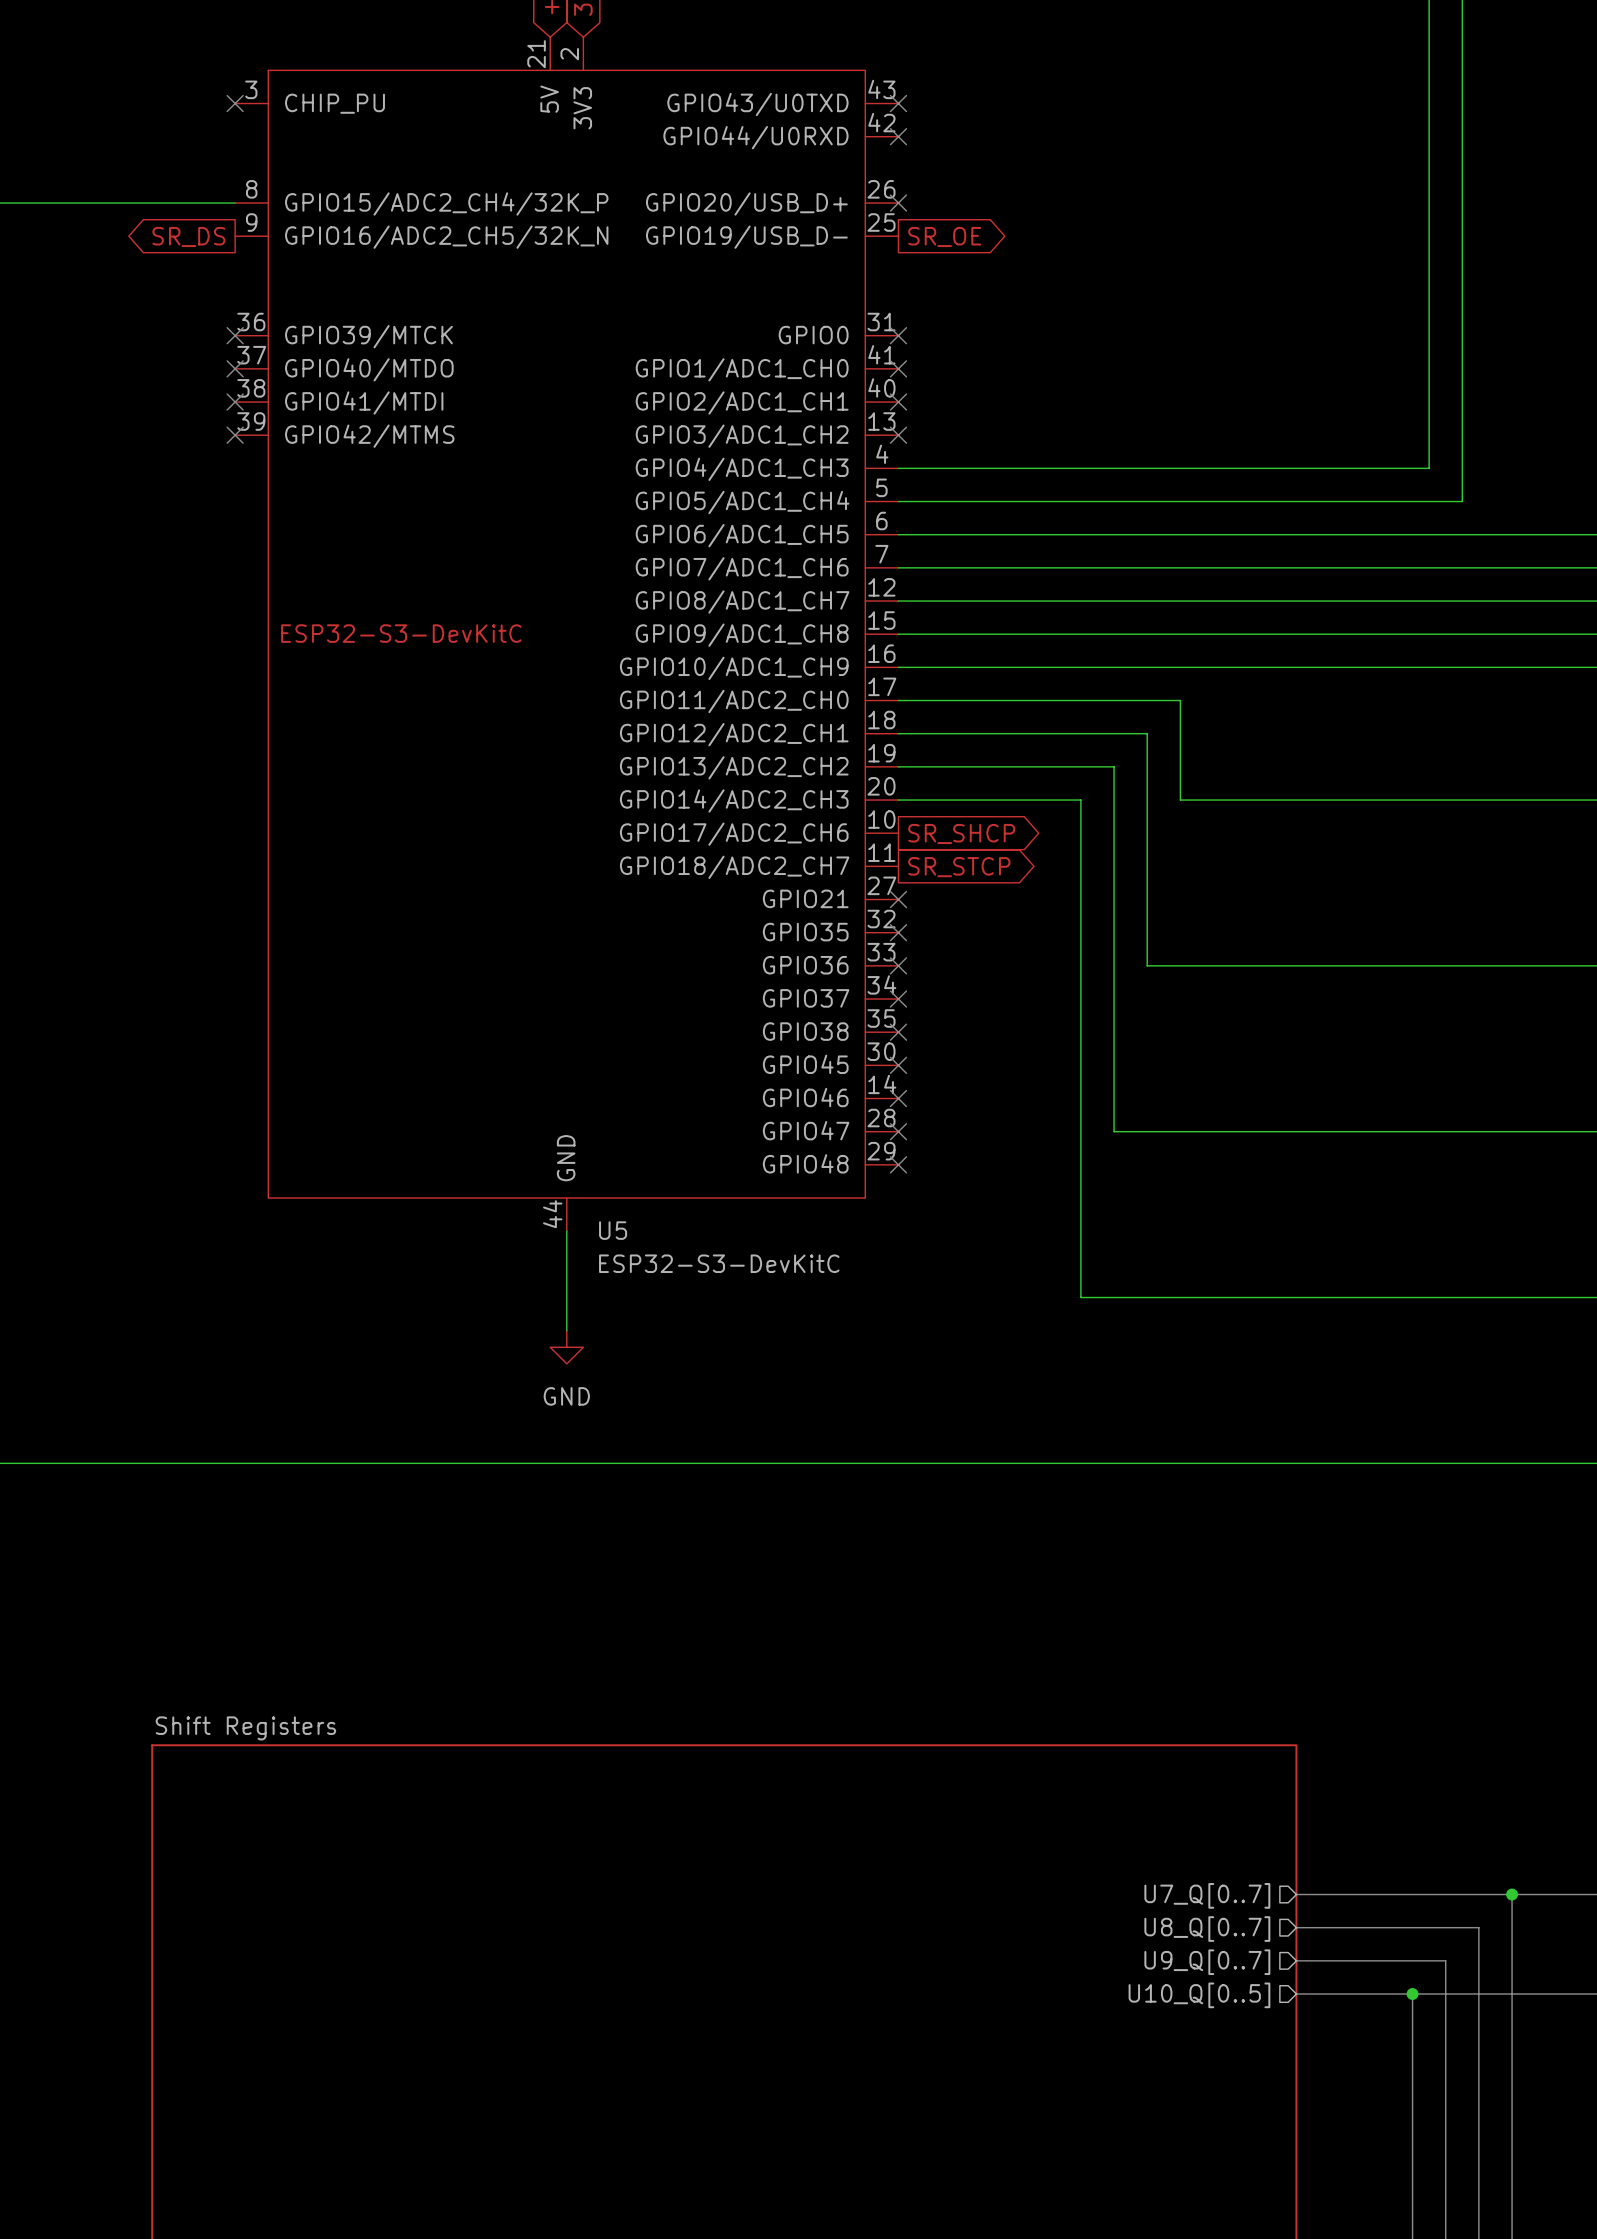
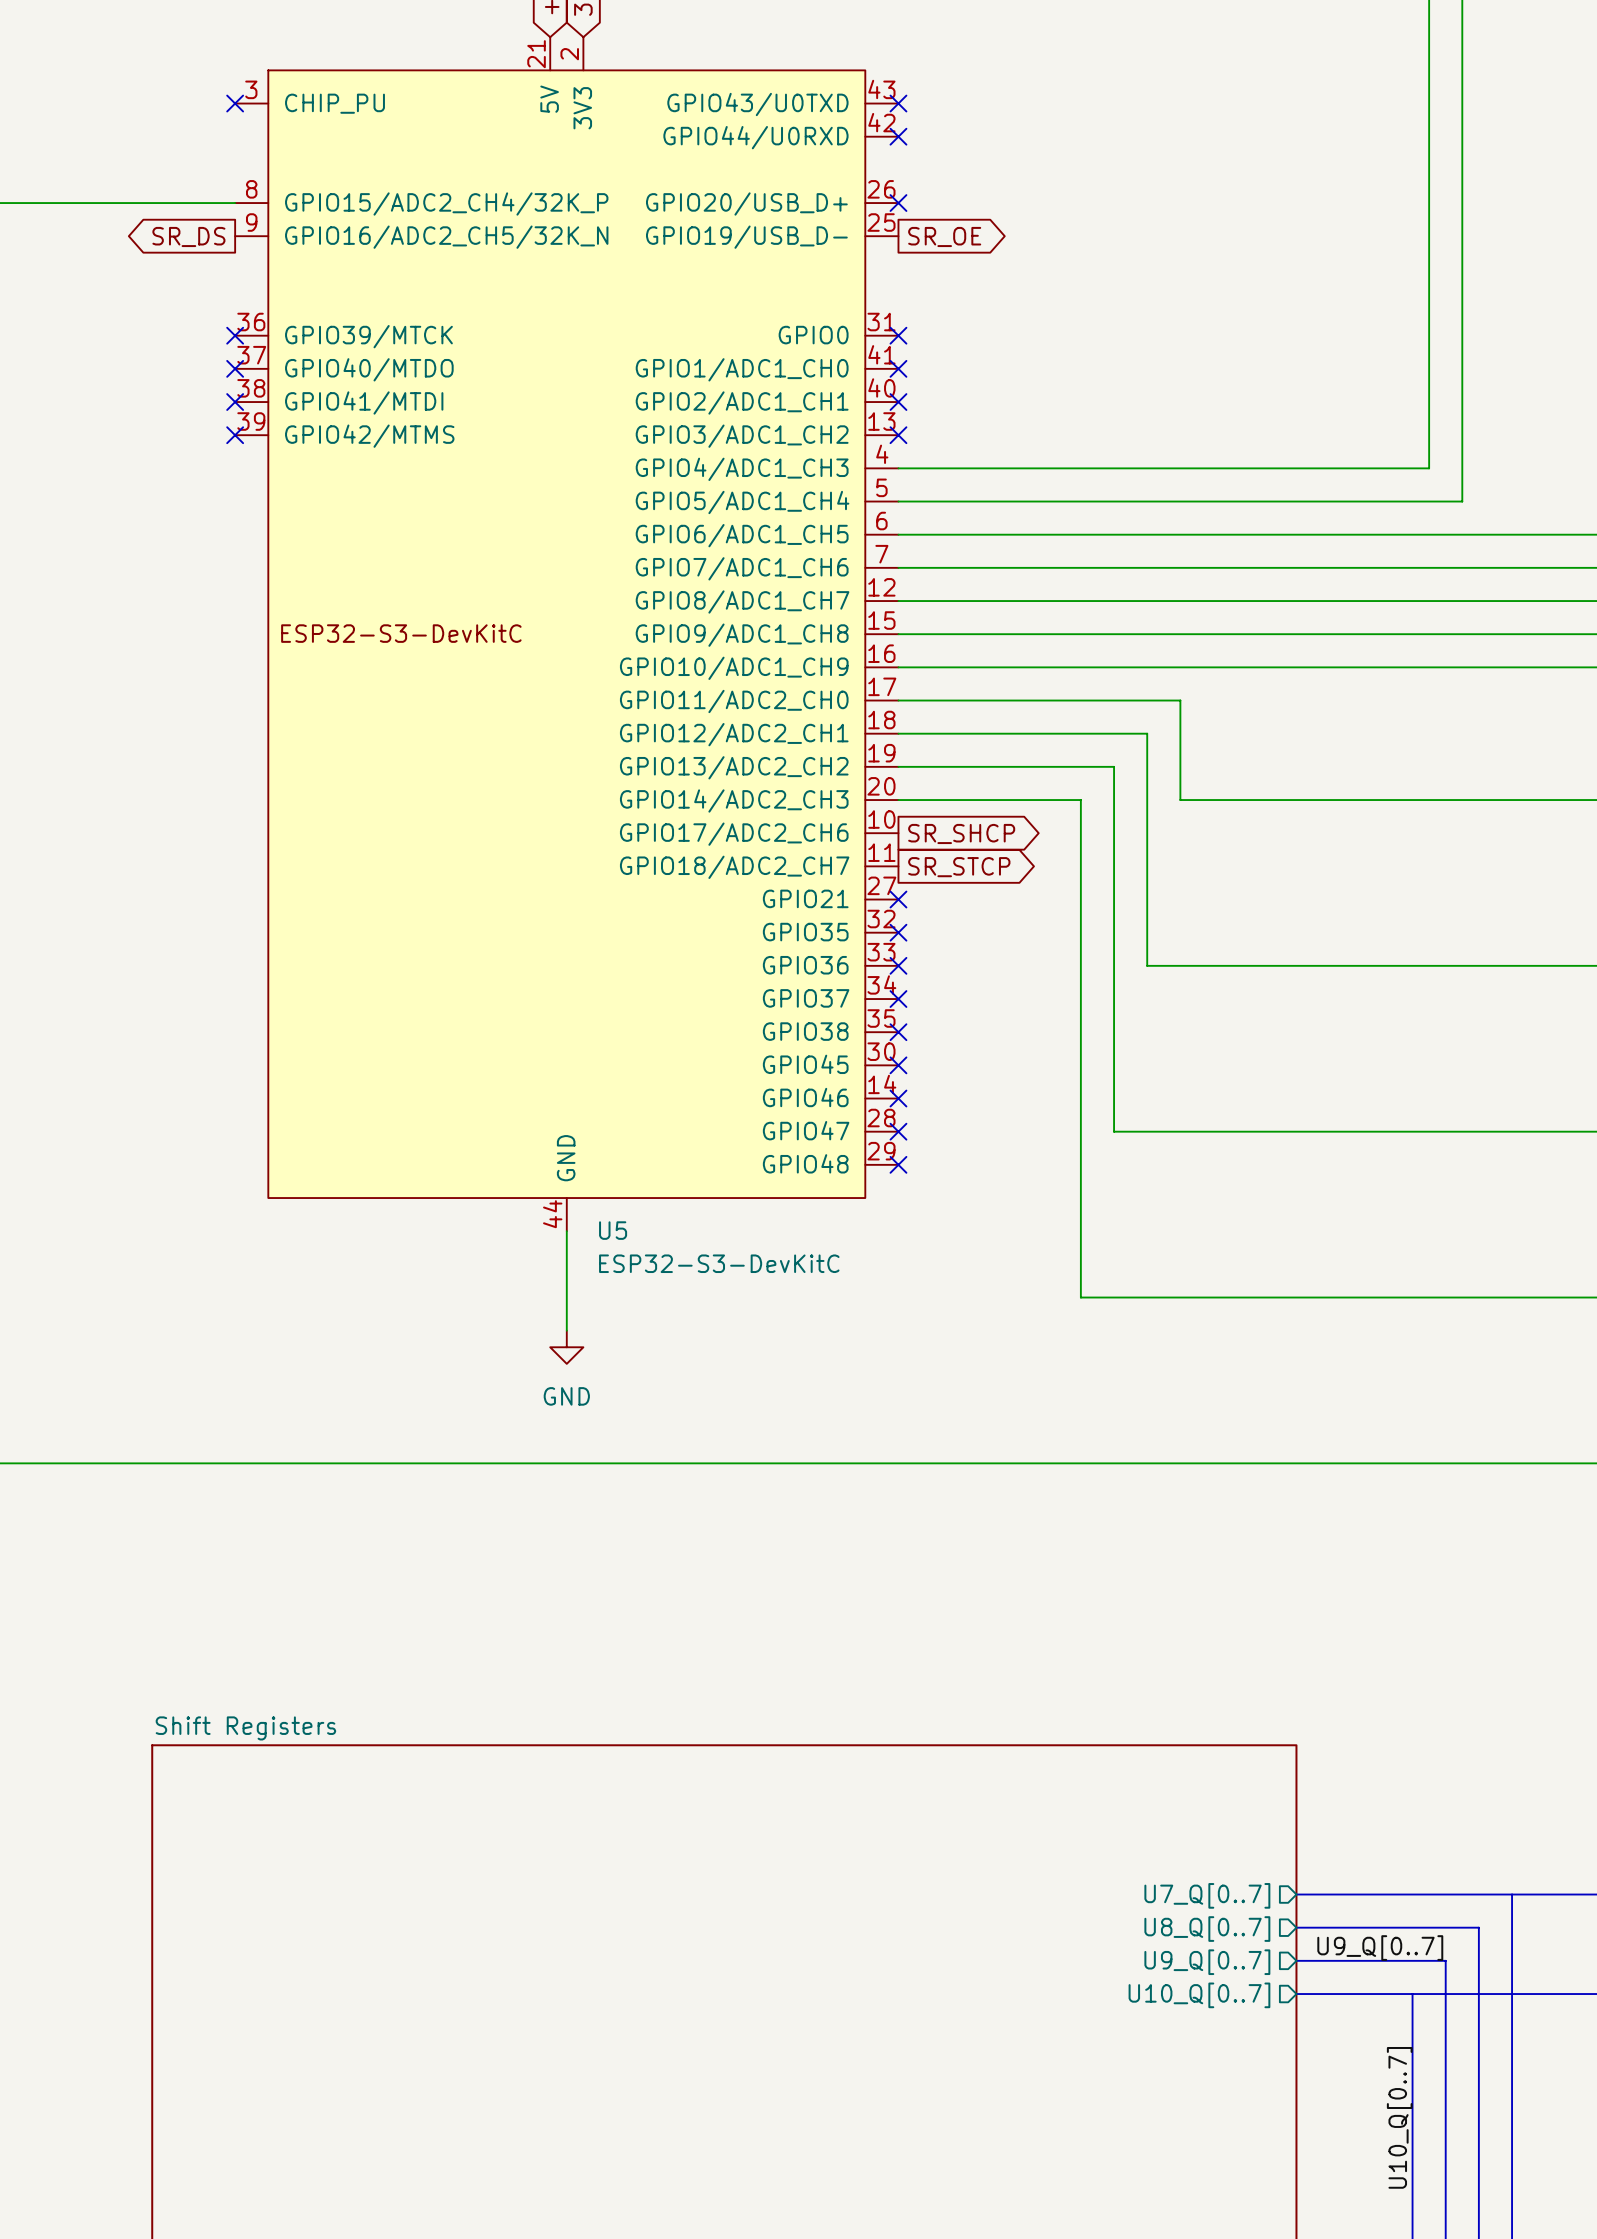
junction: (1512, 1894) -> none
label: none -> U9_Q[0..7] (1380, 1948)
junction: (1412, 1994) -> none
sheet pin: U10_Q[0..5] (1199, 1995) -> U10_Q[0..7] (1199, 1995)
label: none -> U10_Q[0..7] (1399, 2117)

